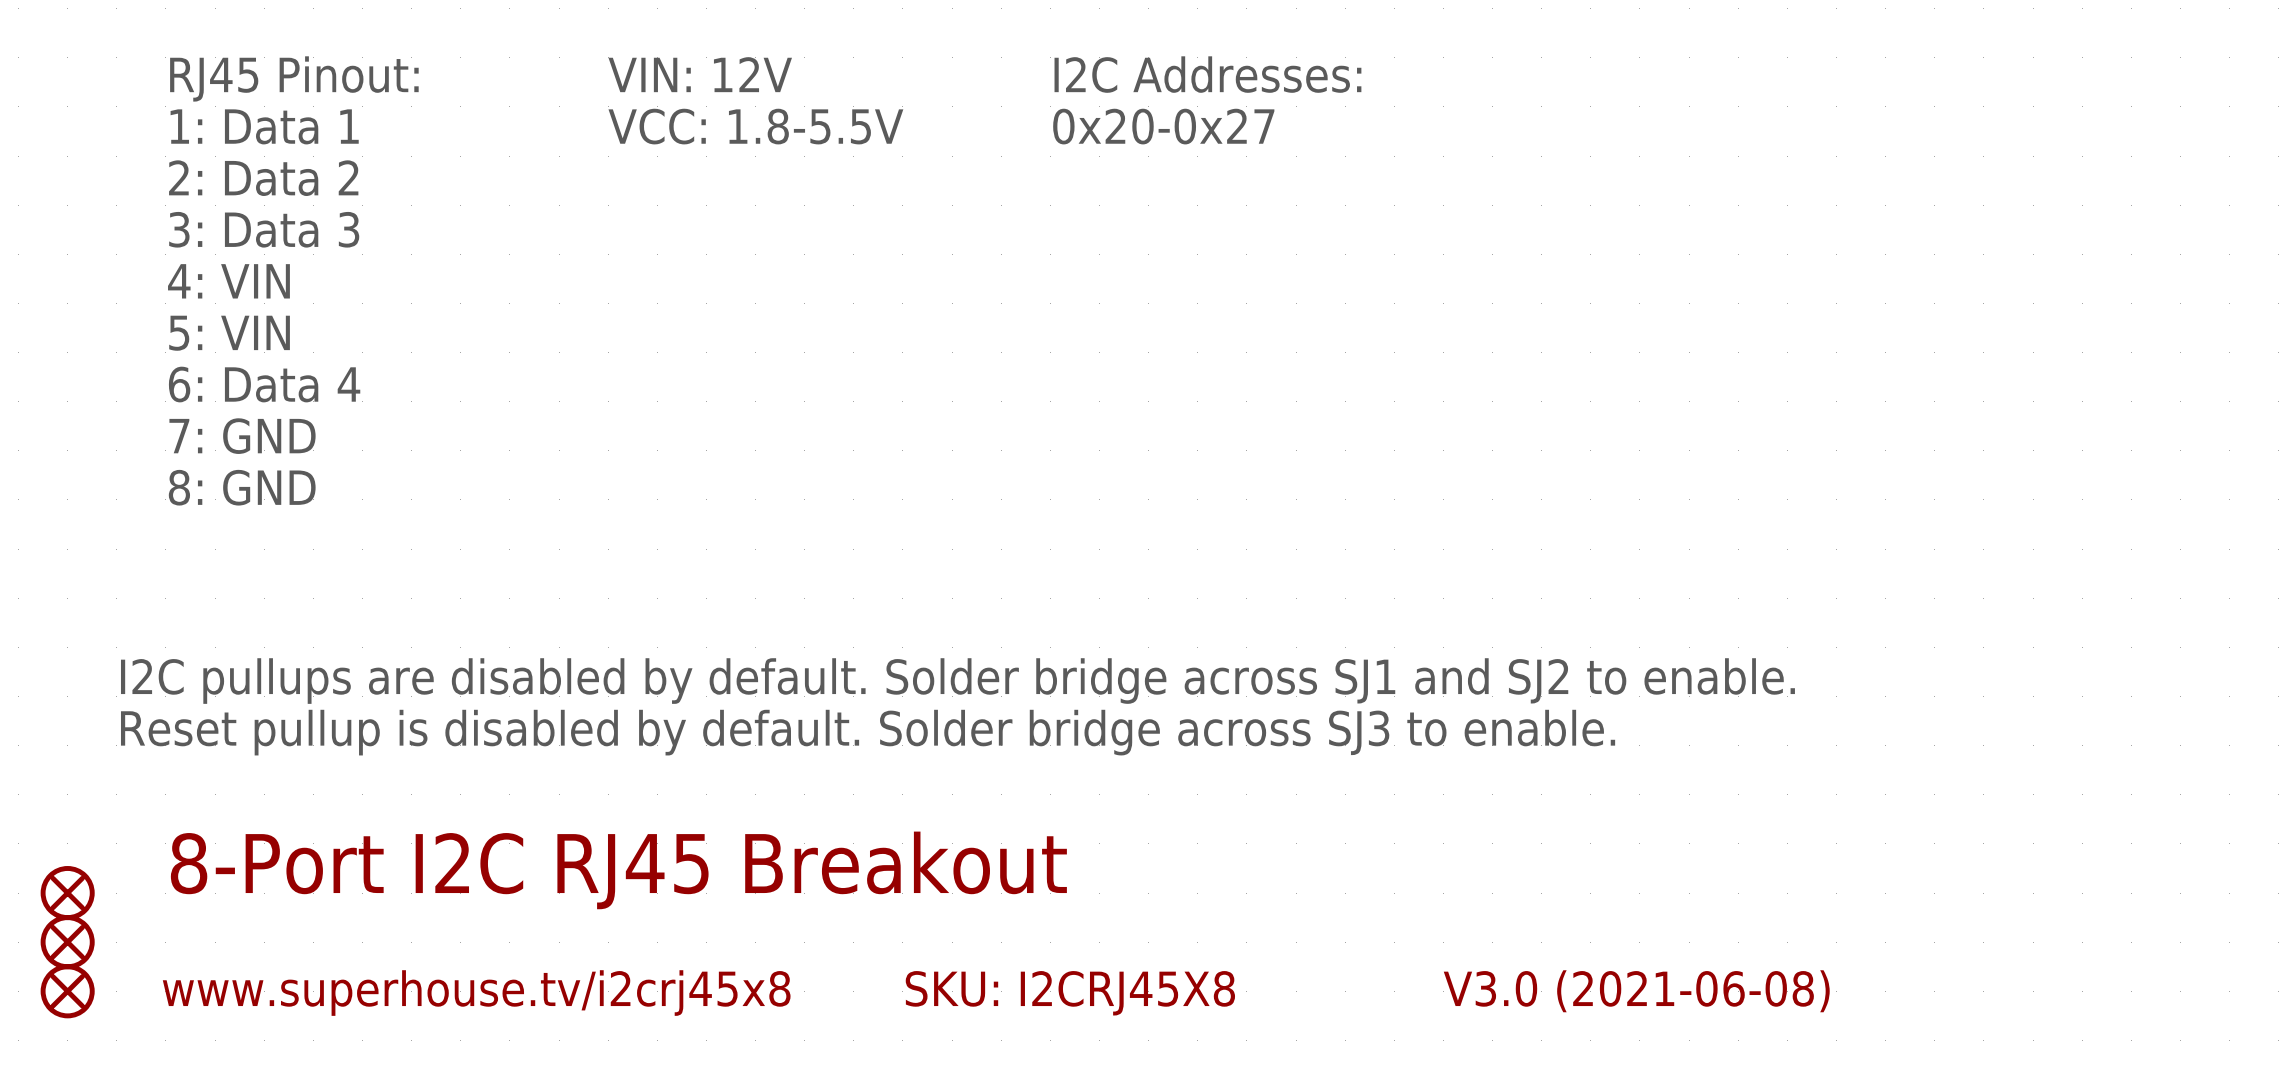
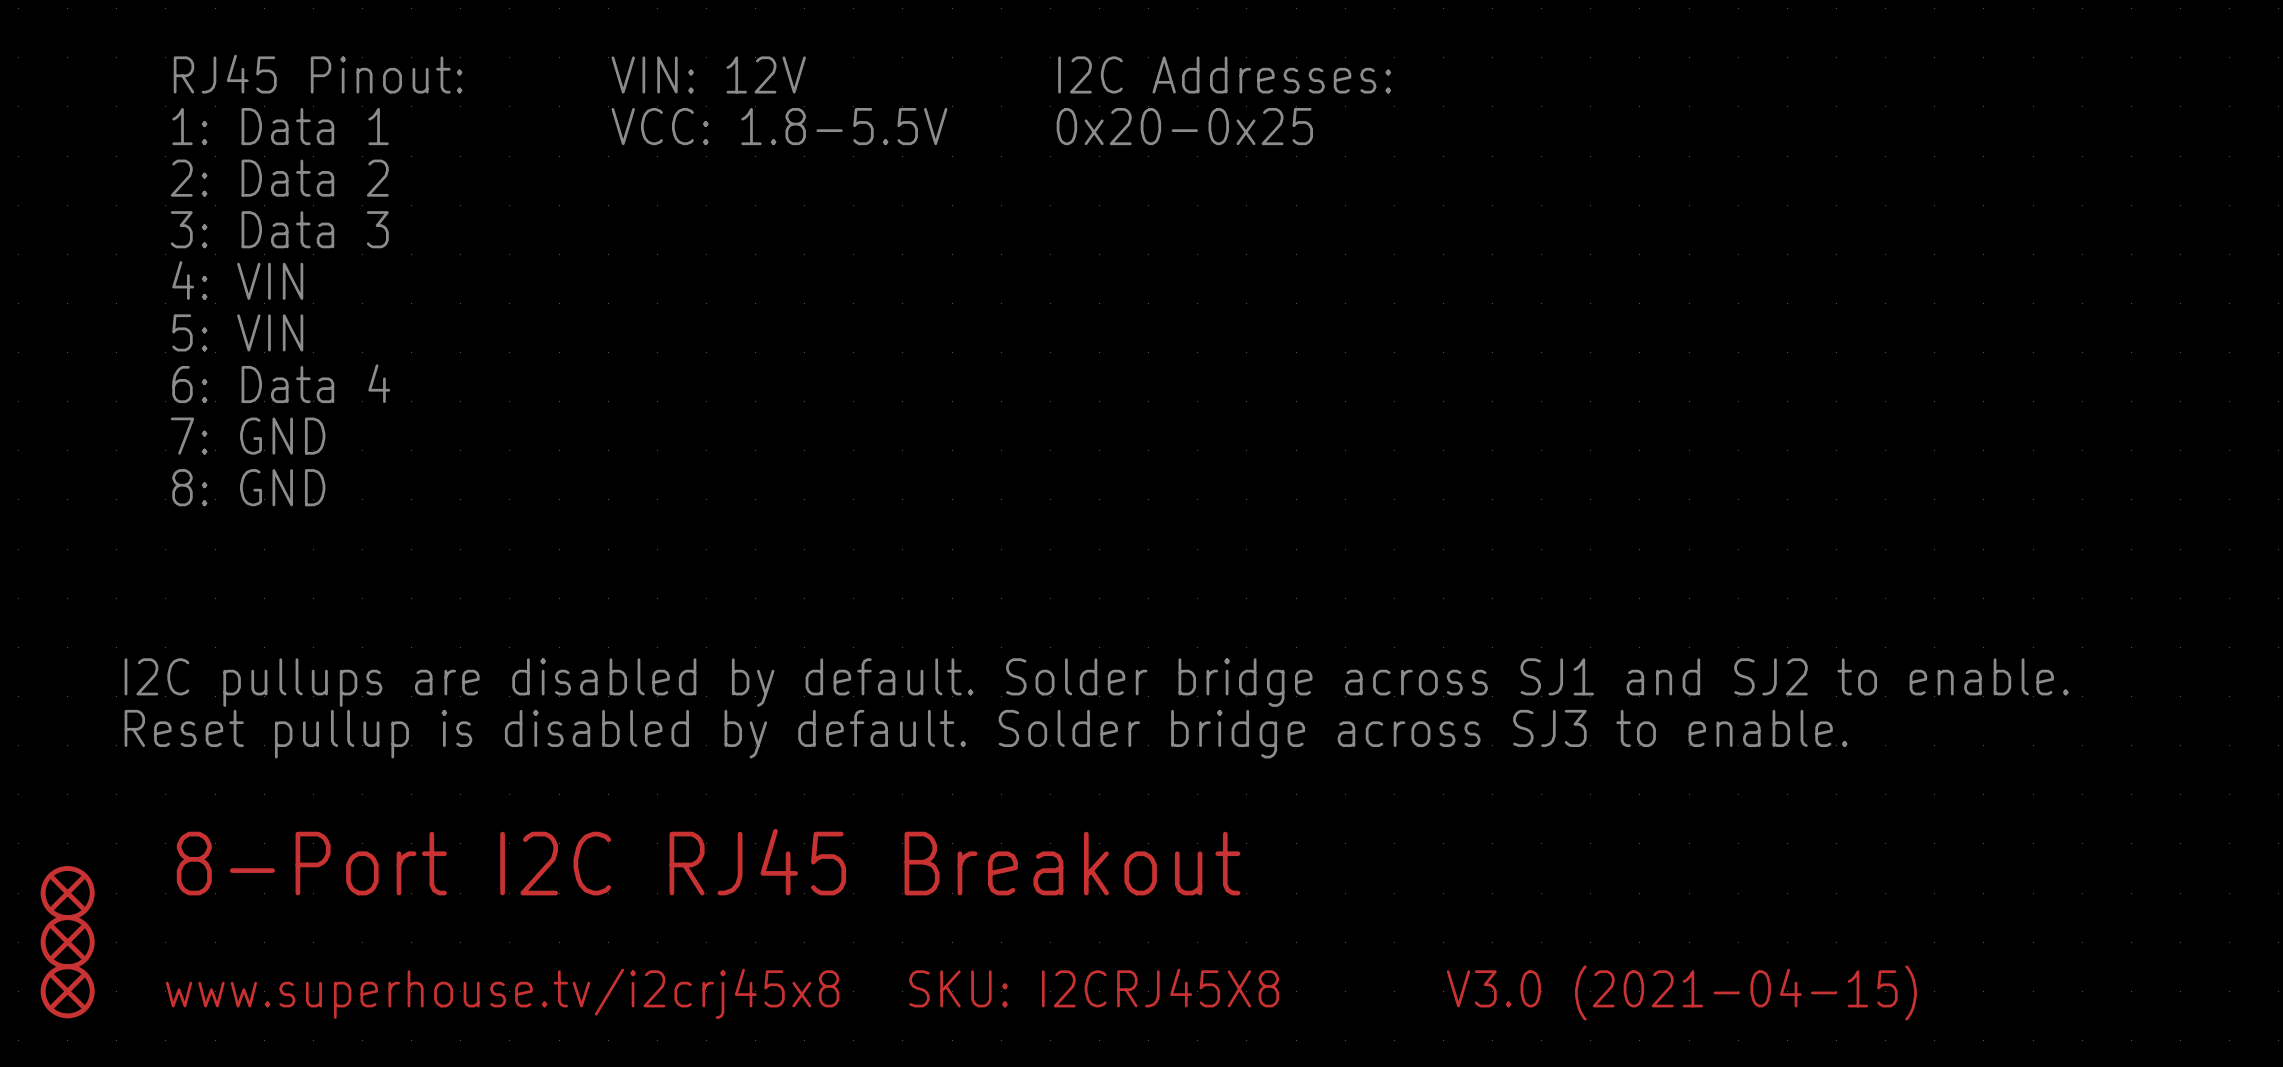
text: 0x20-0x27 (1163, 126) -> 0x20-0x25 (1184, 126)
text: V3.0 (2021-06-08) (1636, 991) -> V3.0 (2021-04-15) (1681, 992)

